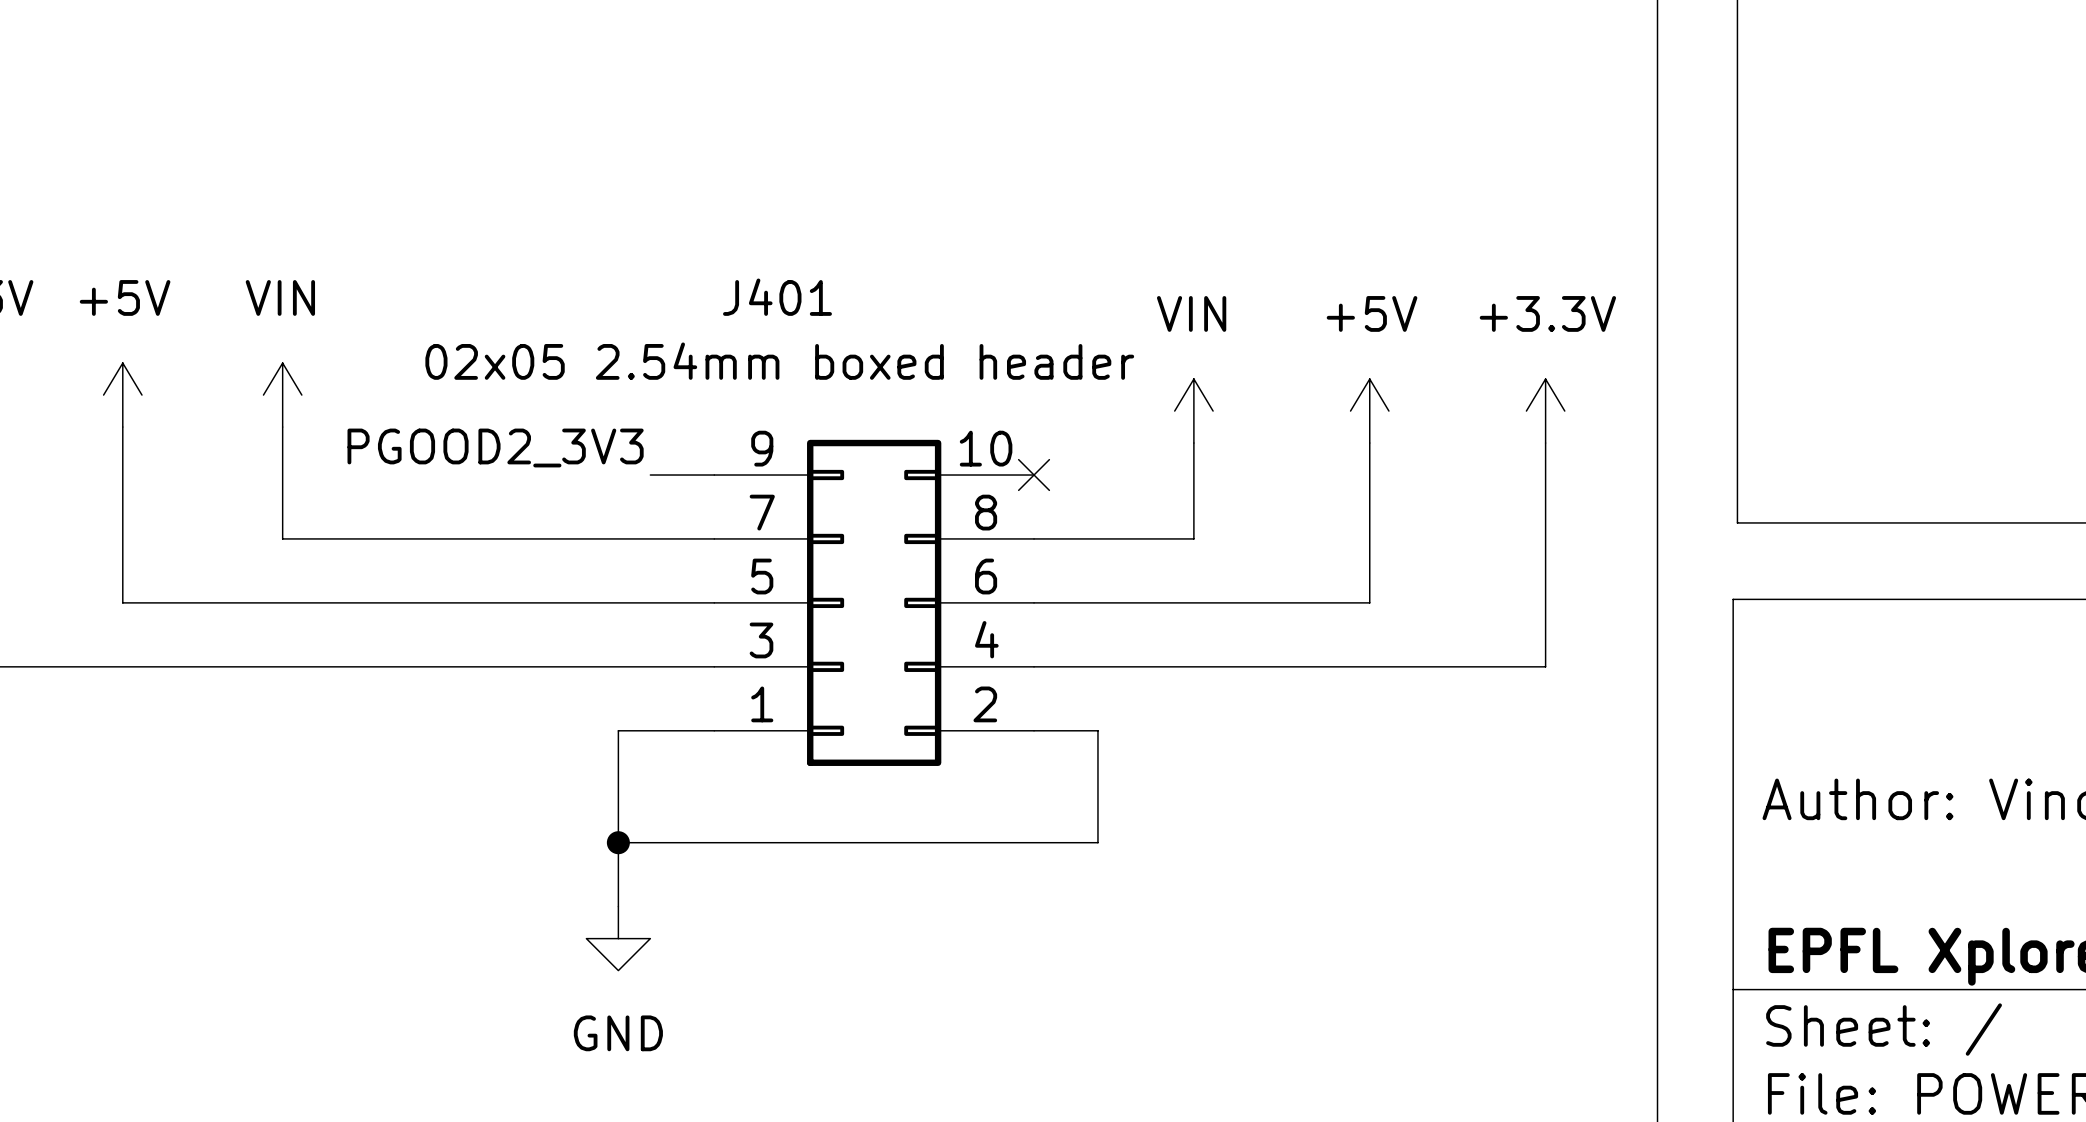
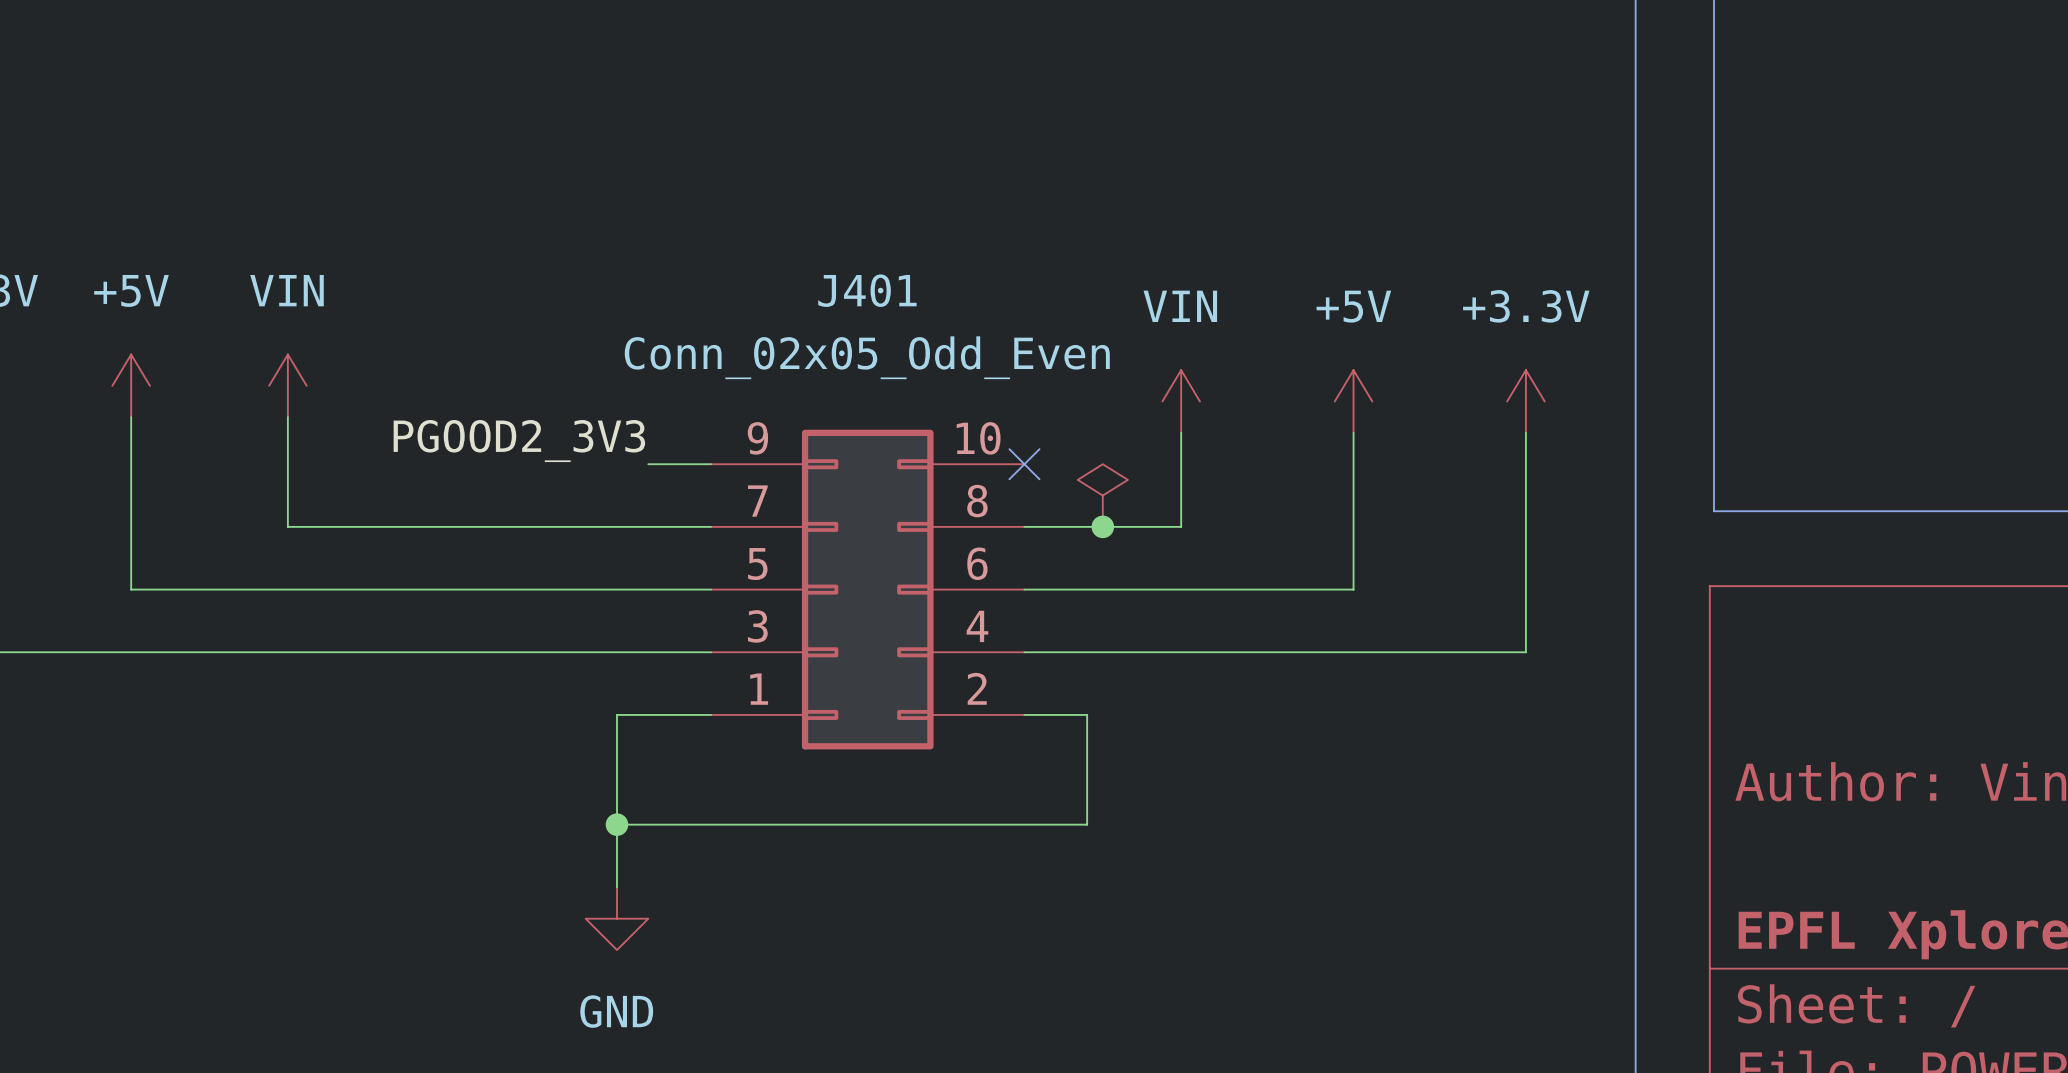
J401 name position: J401 (777, 297) -> J401 (867, 290)
J401 value: 02x05 2.54mm boxed header (779, 361) -> Conn_02x05_Odd_Even (867, 357)
power symbol: none -> (1102, 495)
junction: none -> (1102, 526)

